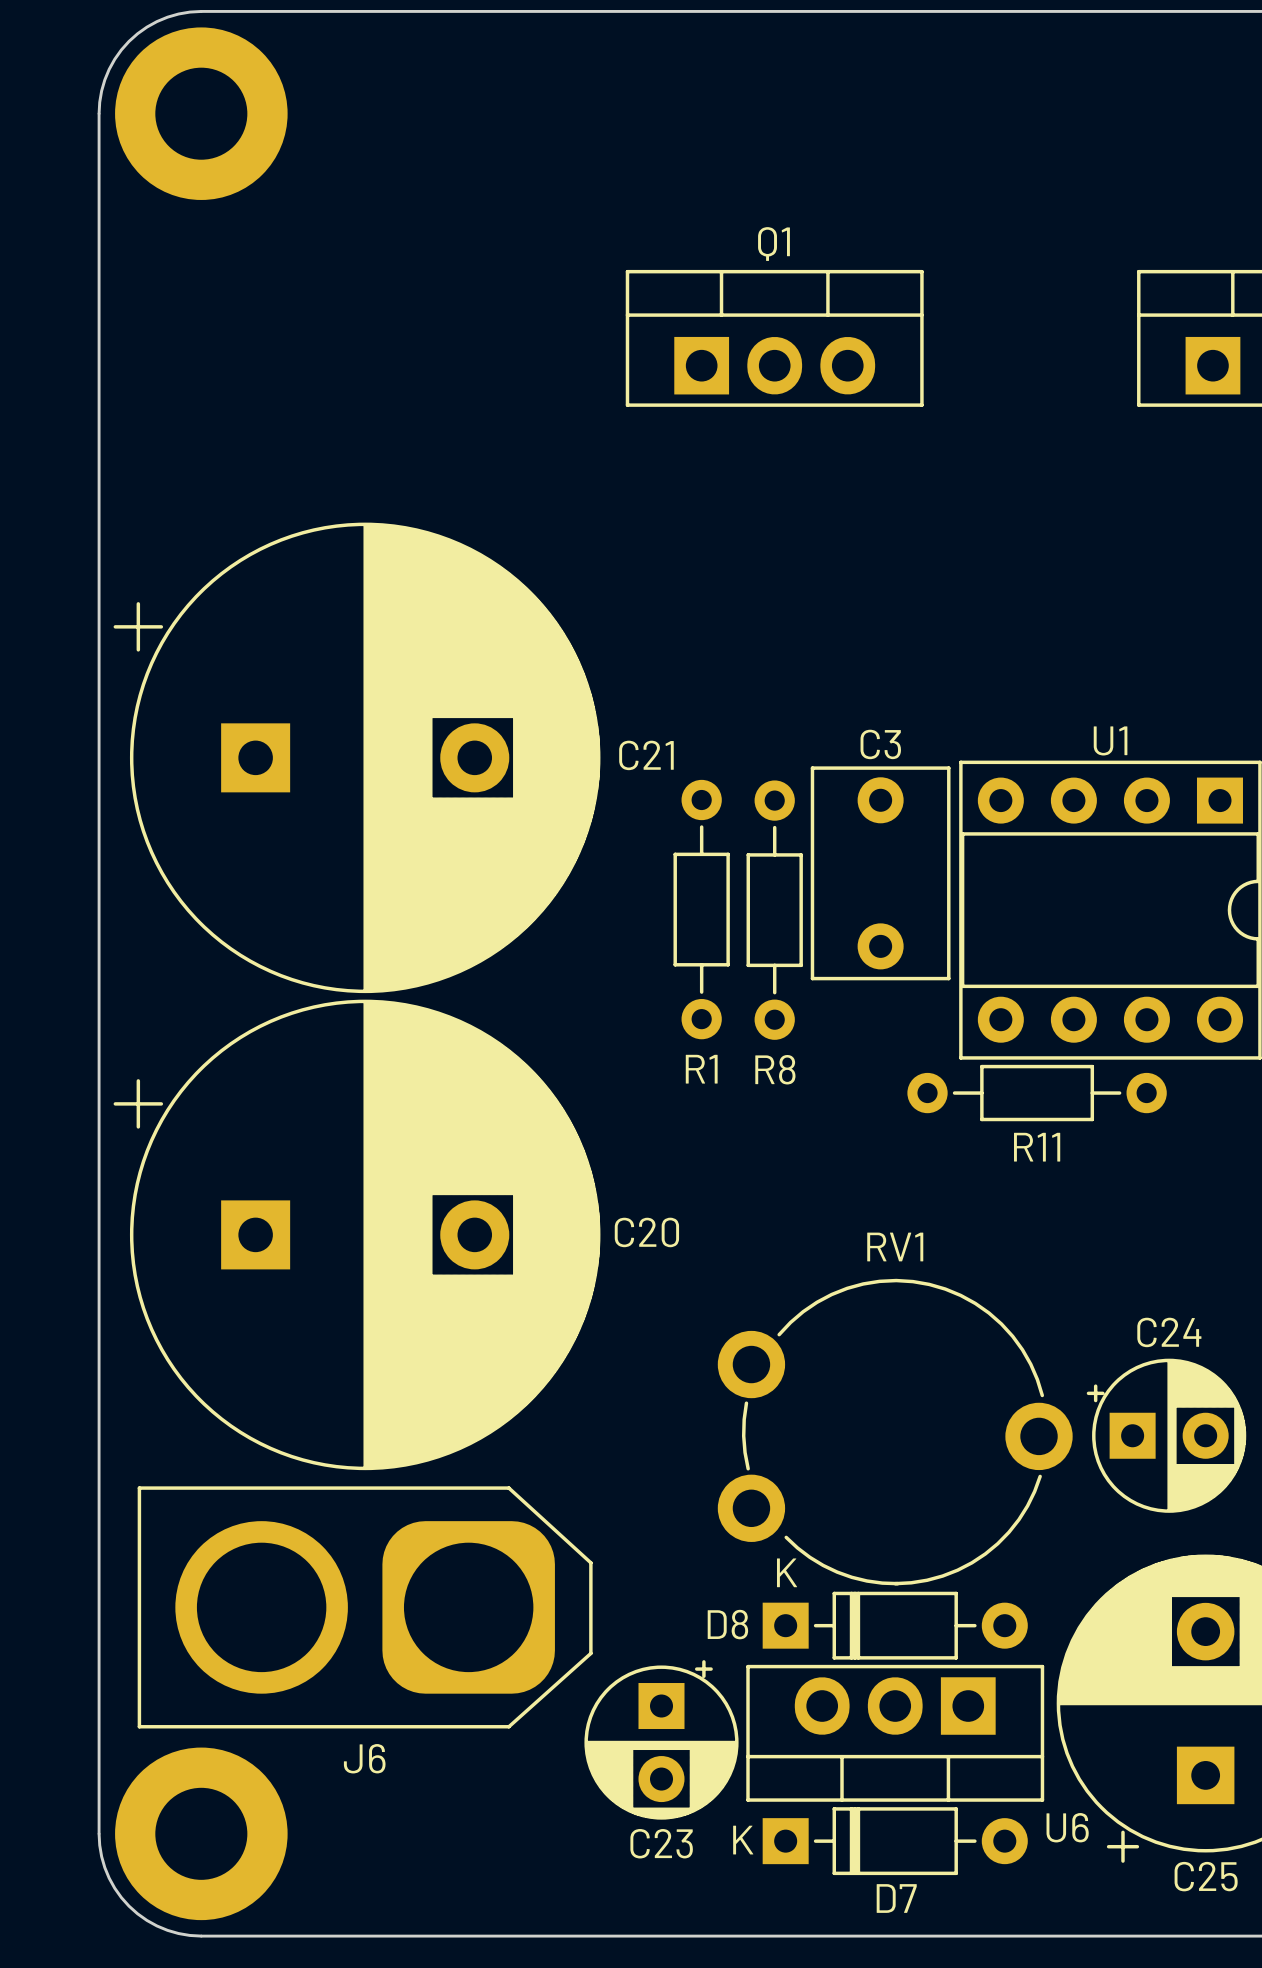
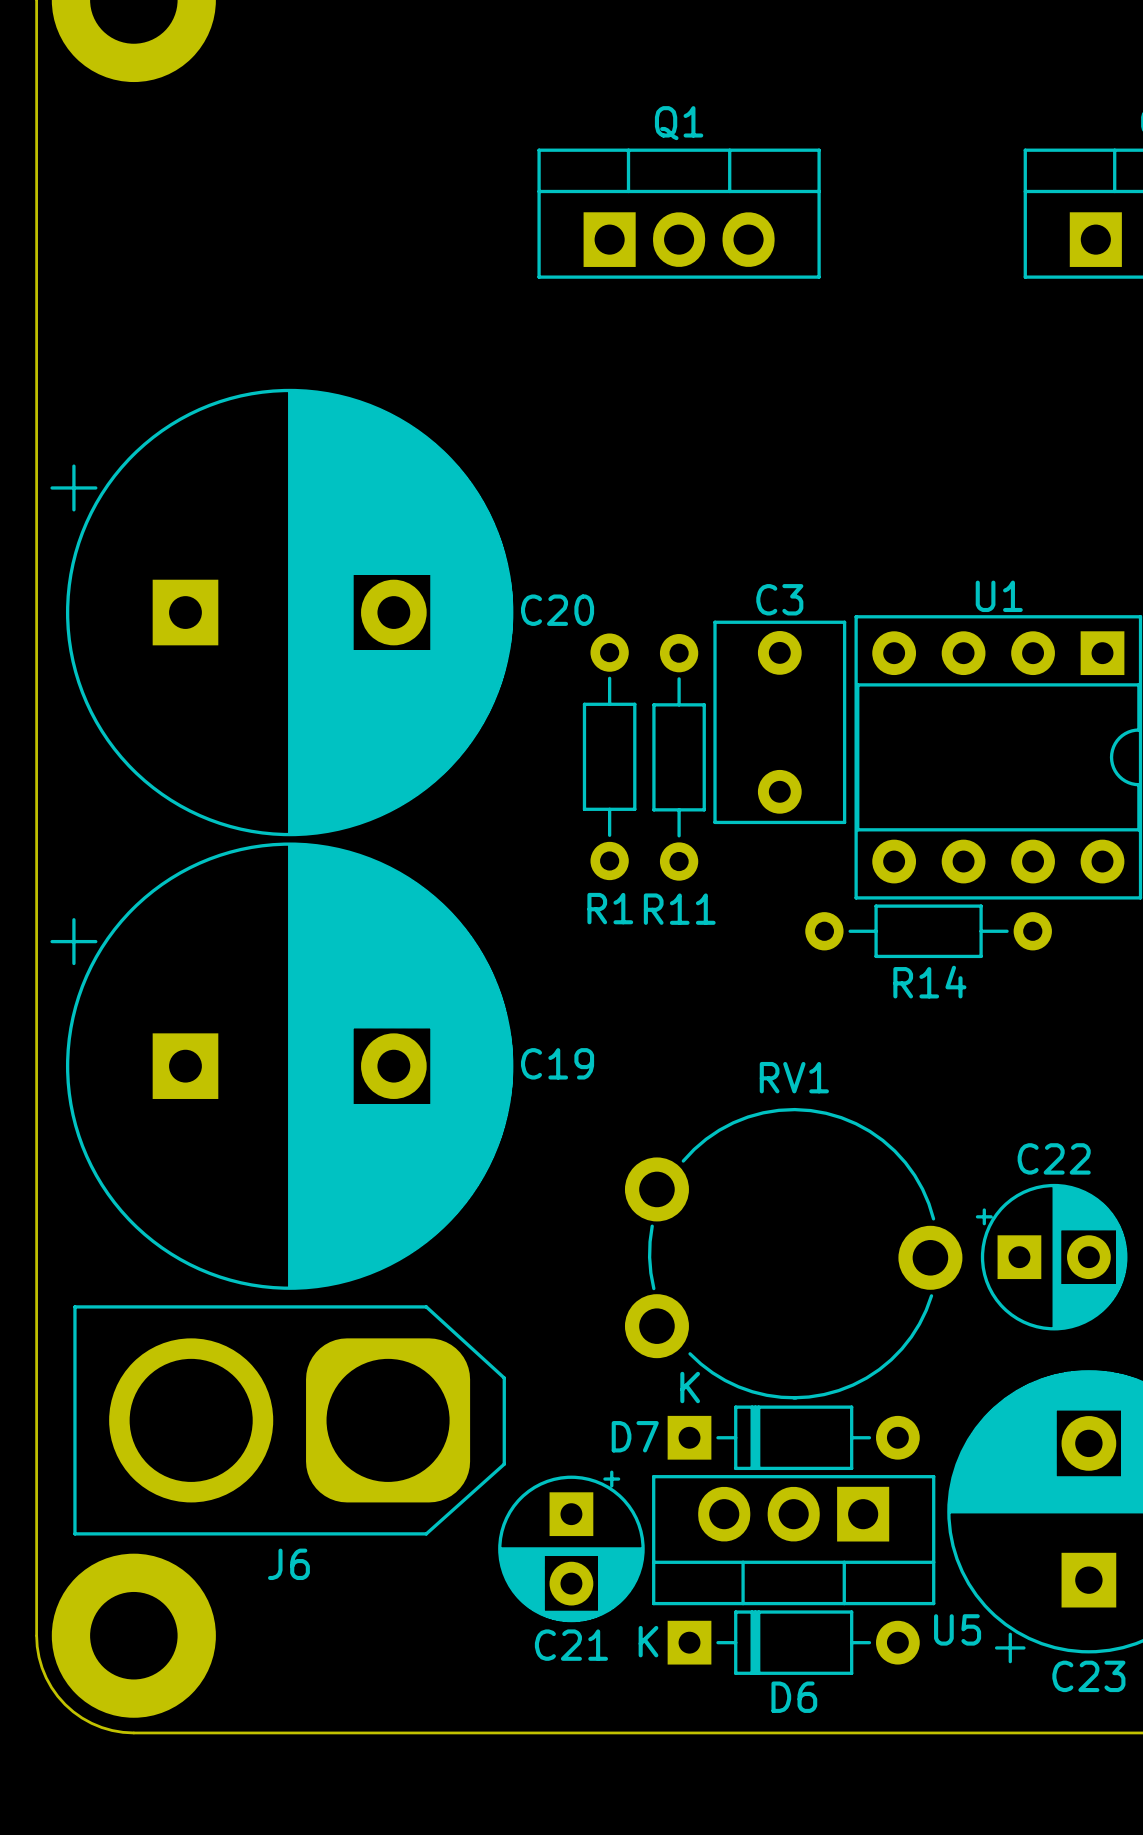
C21 name: C21 (646, 755) -> C20 (557, 610)
R8 name: R8 (775, 1069) -> R11 (679, 909)
R11 name: R11 (1037, 1147) -> R14 (929, 982)
C20 name: C20 (646, 1232) -> C19 (557, 1063)
C24 name: C24 (1169, 1332) -> C22 (1054, 1158)
D8 name: D8 (727, 1624) -> D7 (635, 1436)
U6 name: U6 (1067, 1827) -> U5 (957, 1629)
C23 name: C23 (661, 1843) -> C21 (571, 1645)
C25 name: C25 (1206, 1876) -> C23 (1088, 1676)
D7 name: D7 (896, 1898) -> D6 (794, 1697)

